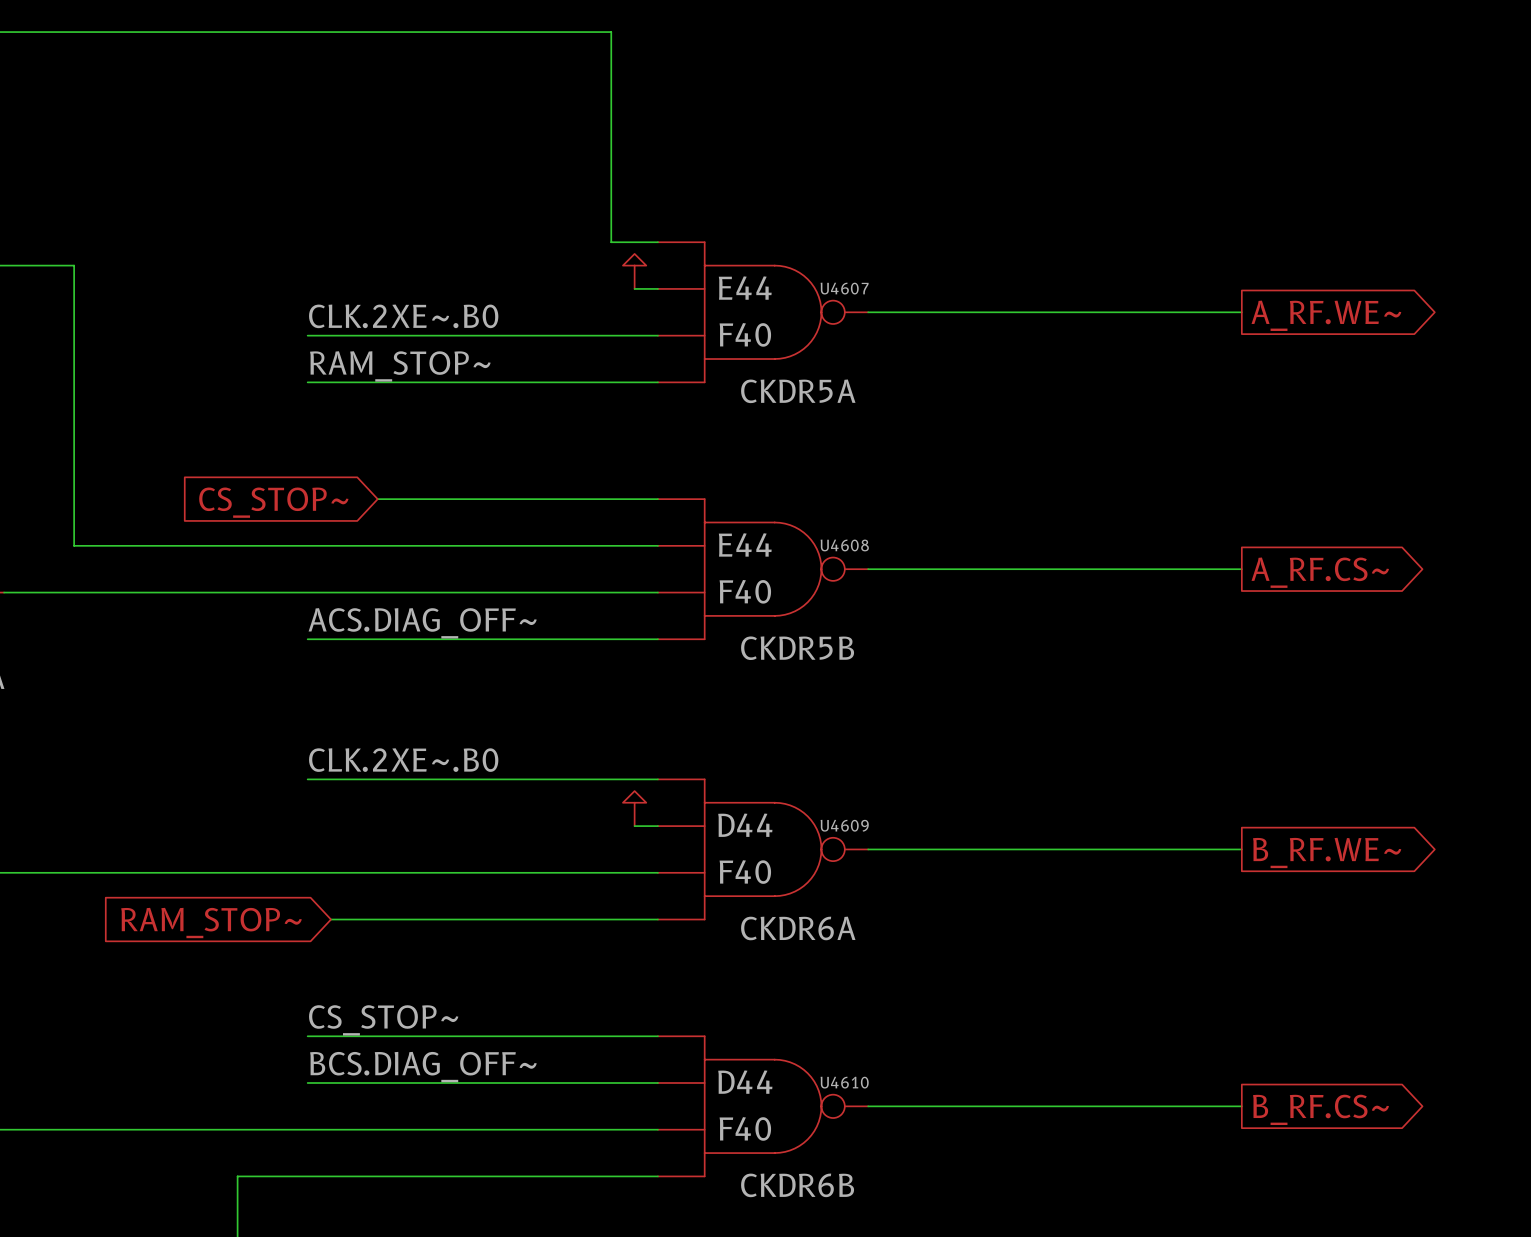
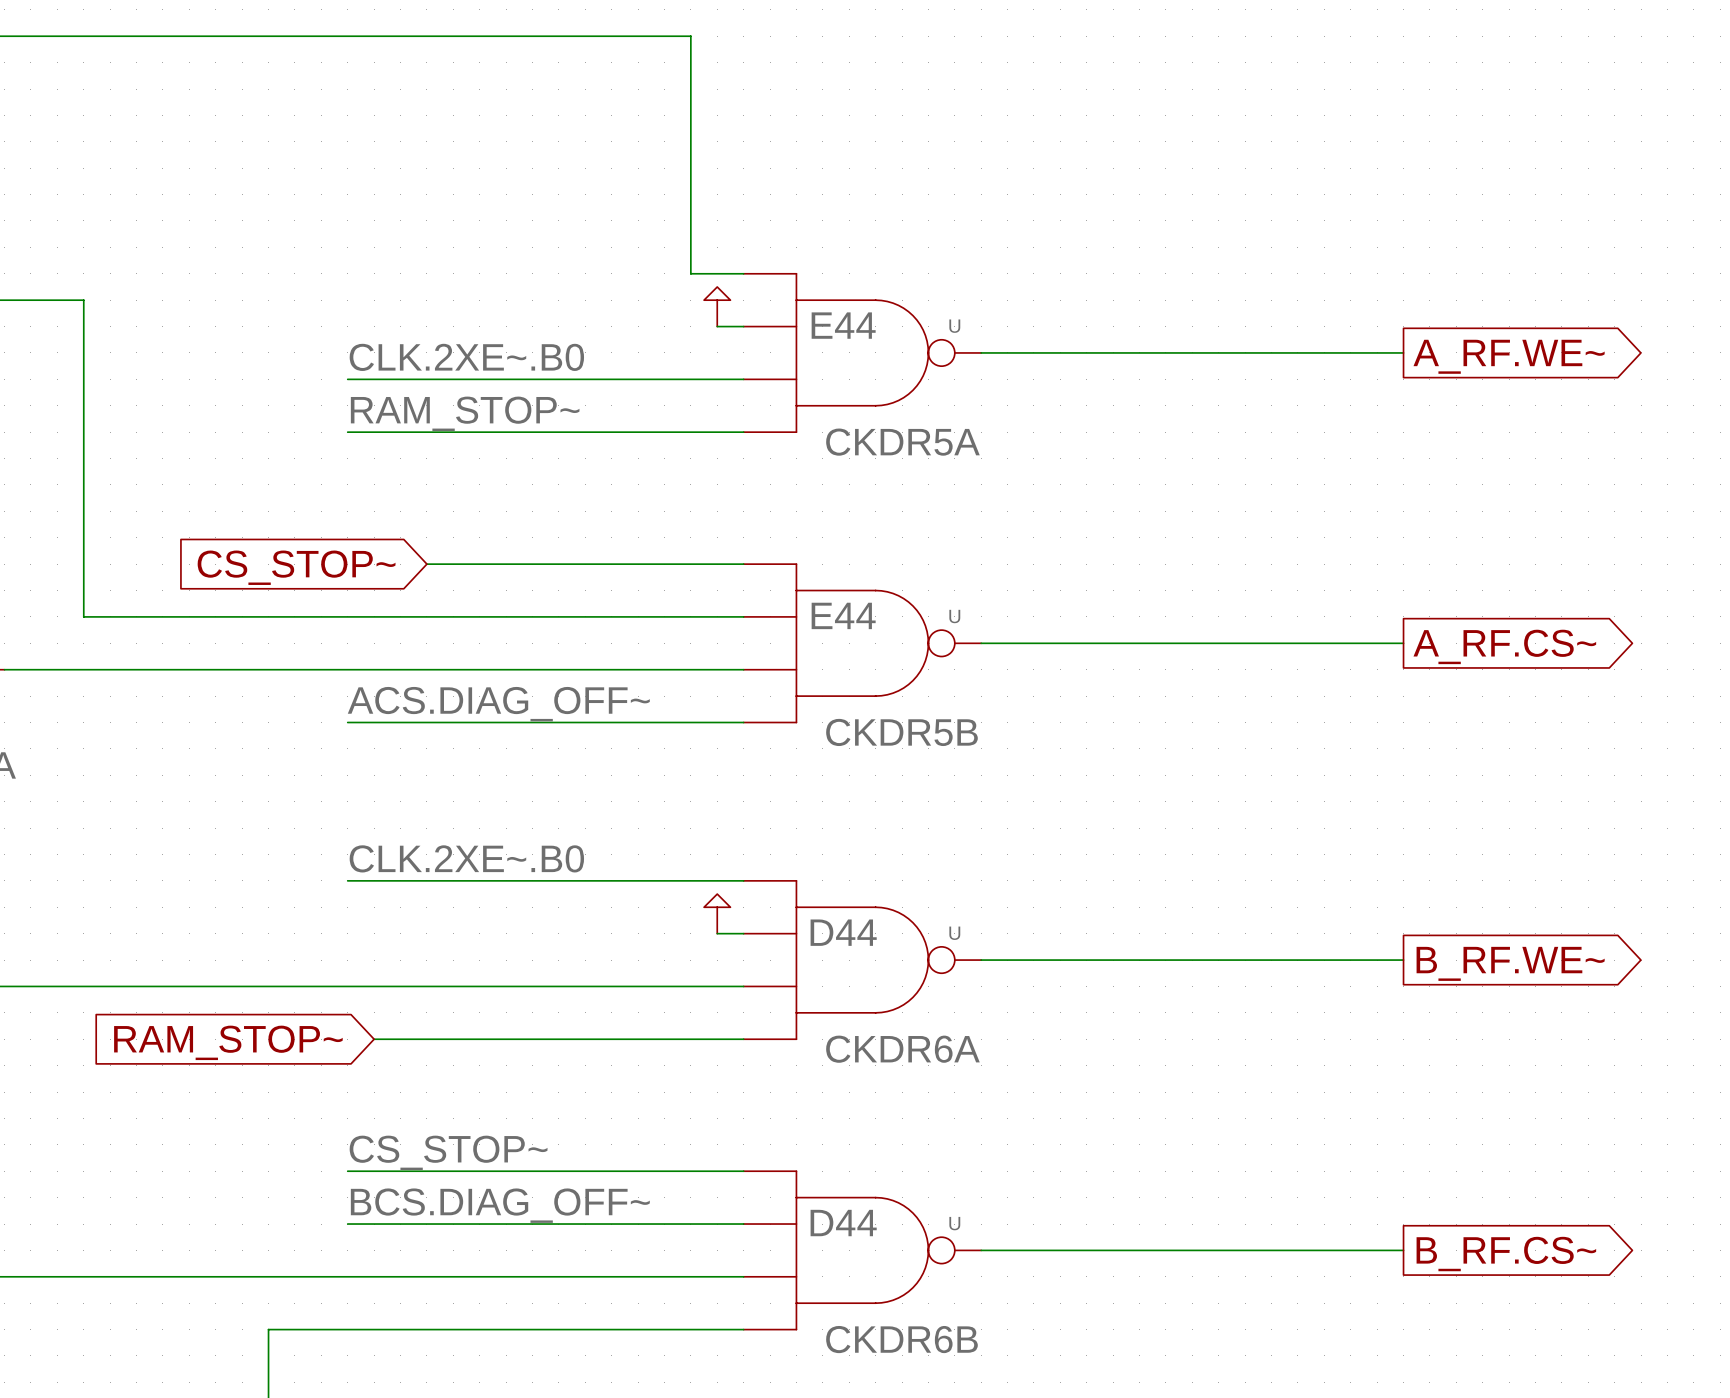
U4607 name: U4607 (844, 288) -> U (954, 326)
U4607 value: F40 (745, 334) -> none
U4608 name: U4608 (844, 545) -> U (954, 616)
U4608 value: F40 (745, 591) -> none
U4609 name: U4609 (844, 825) -> U (954, 933)
U4609 value: F40 (745, 872) -> none
U4610 name: U4610 (844, 1082) -> U (954, 1223)
U4610 value: F40 (745, 1128) -> none

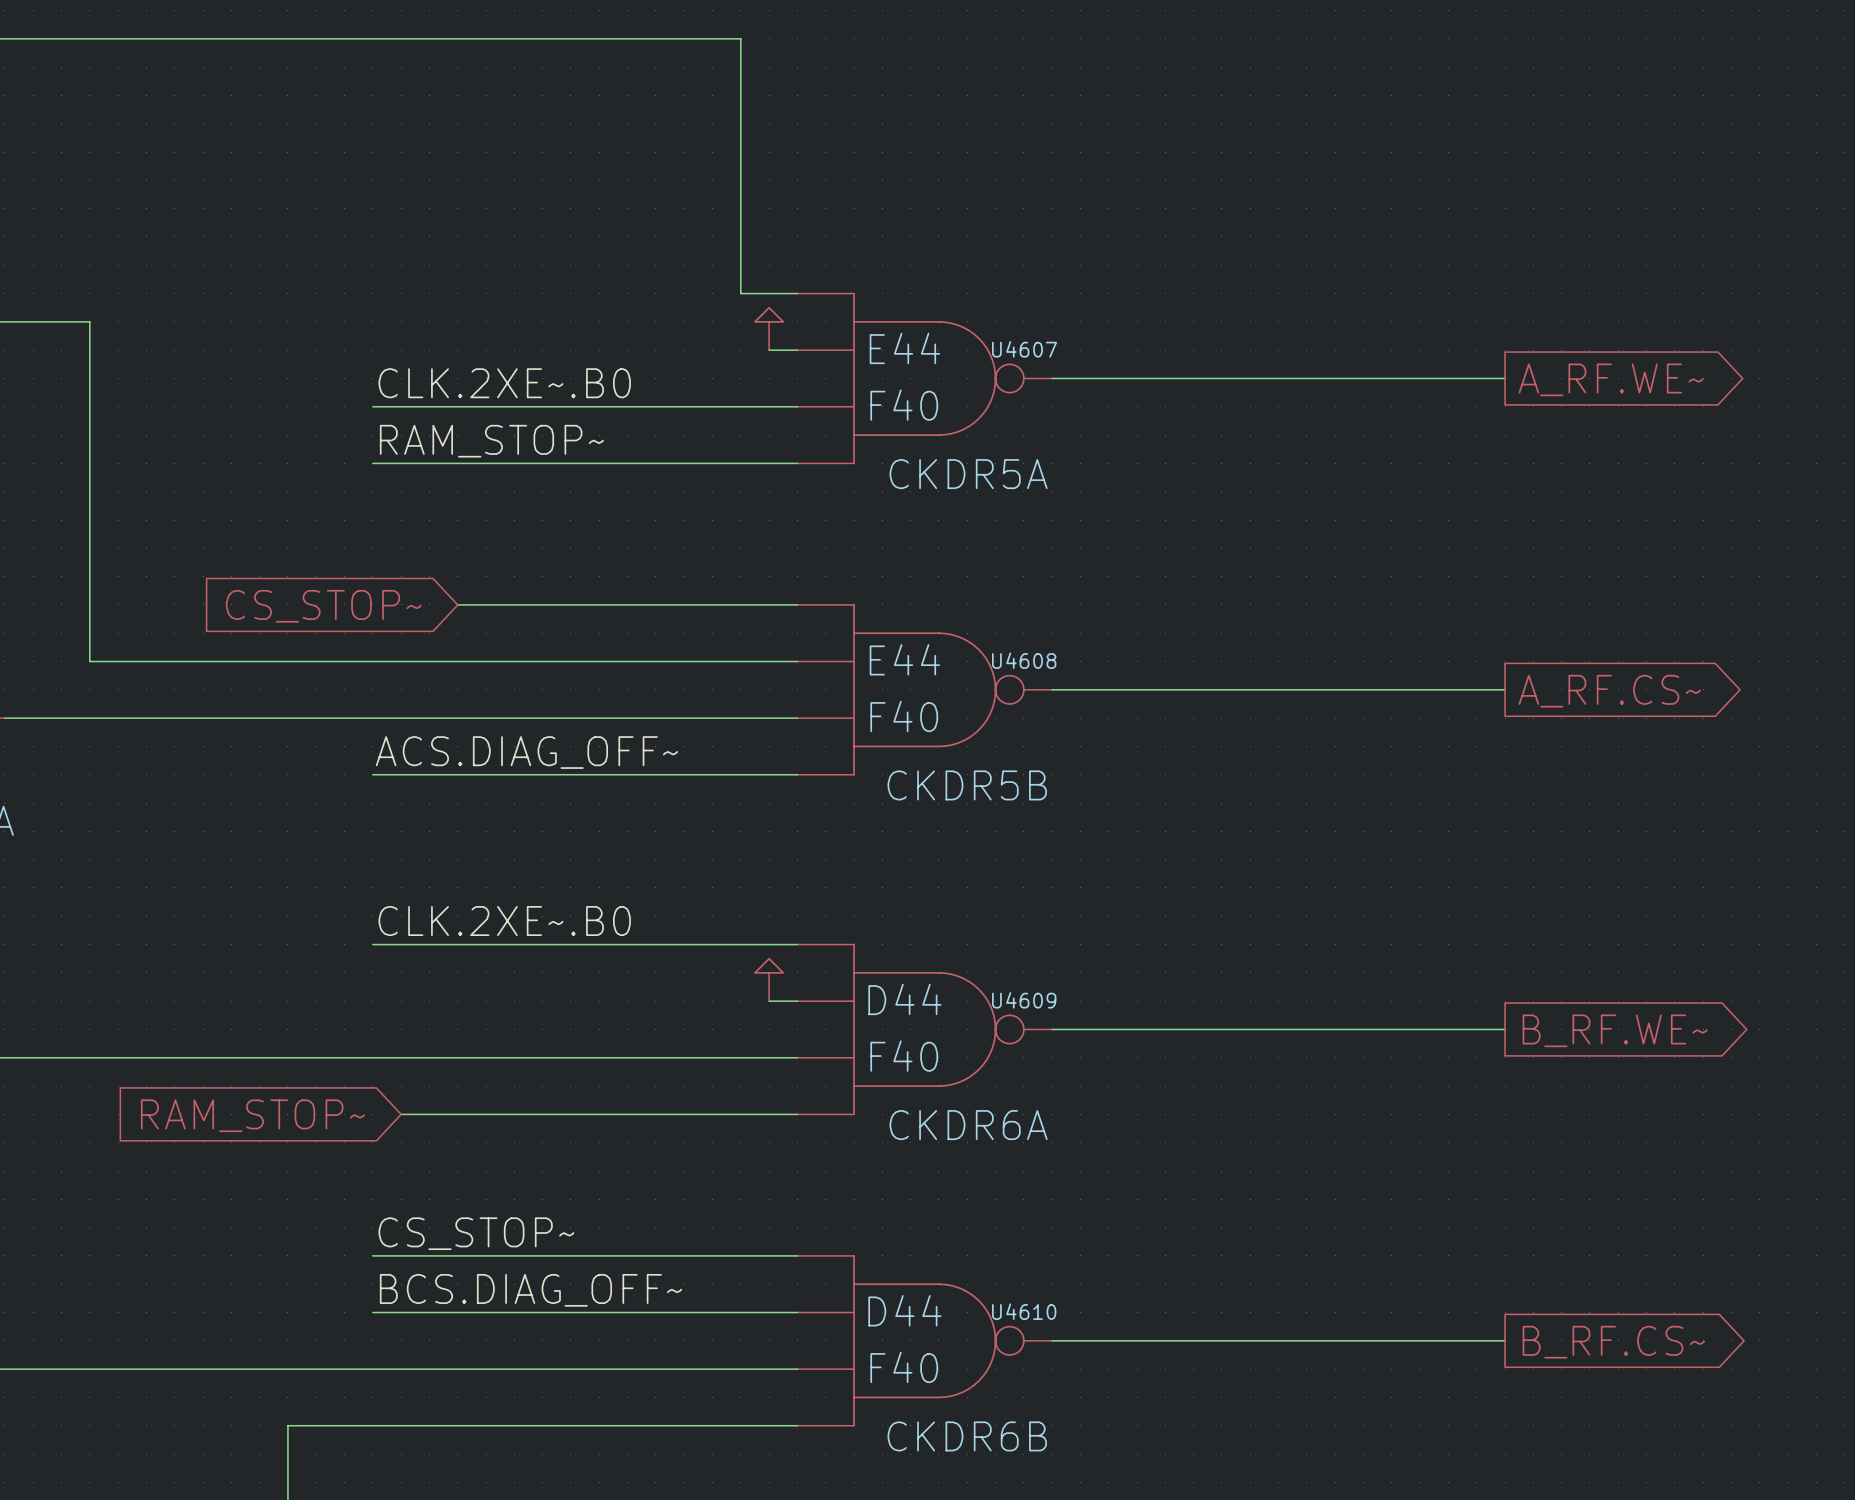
U name: U (954, 326) -> U4607 (1024, 349)
U value: none -> F40 (904, 405)
U name: U (954, 616) -> U4608 (1024, 660)
U value: none -> F40 (904, 716)
U name: U (954, 933) -> U4609 (1024, 1000)
U value: none -> F40 (904, 1056)
U name: U (954, 1223) -> U4610 (1024, 1311)
U value: none -> F40 (904, 1367)

